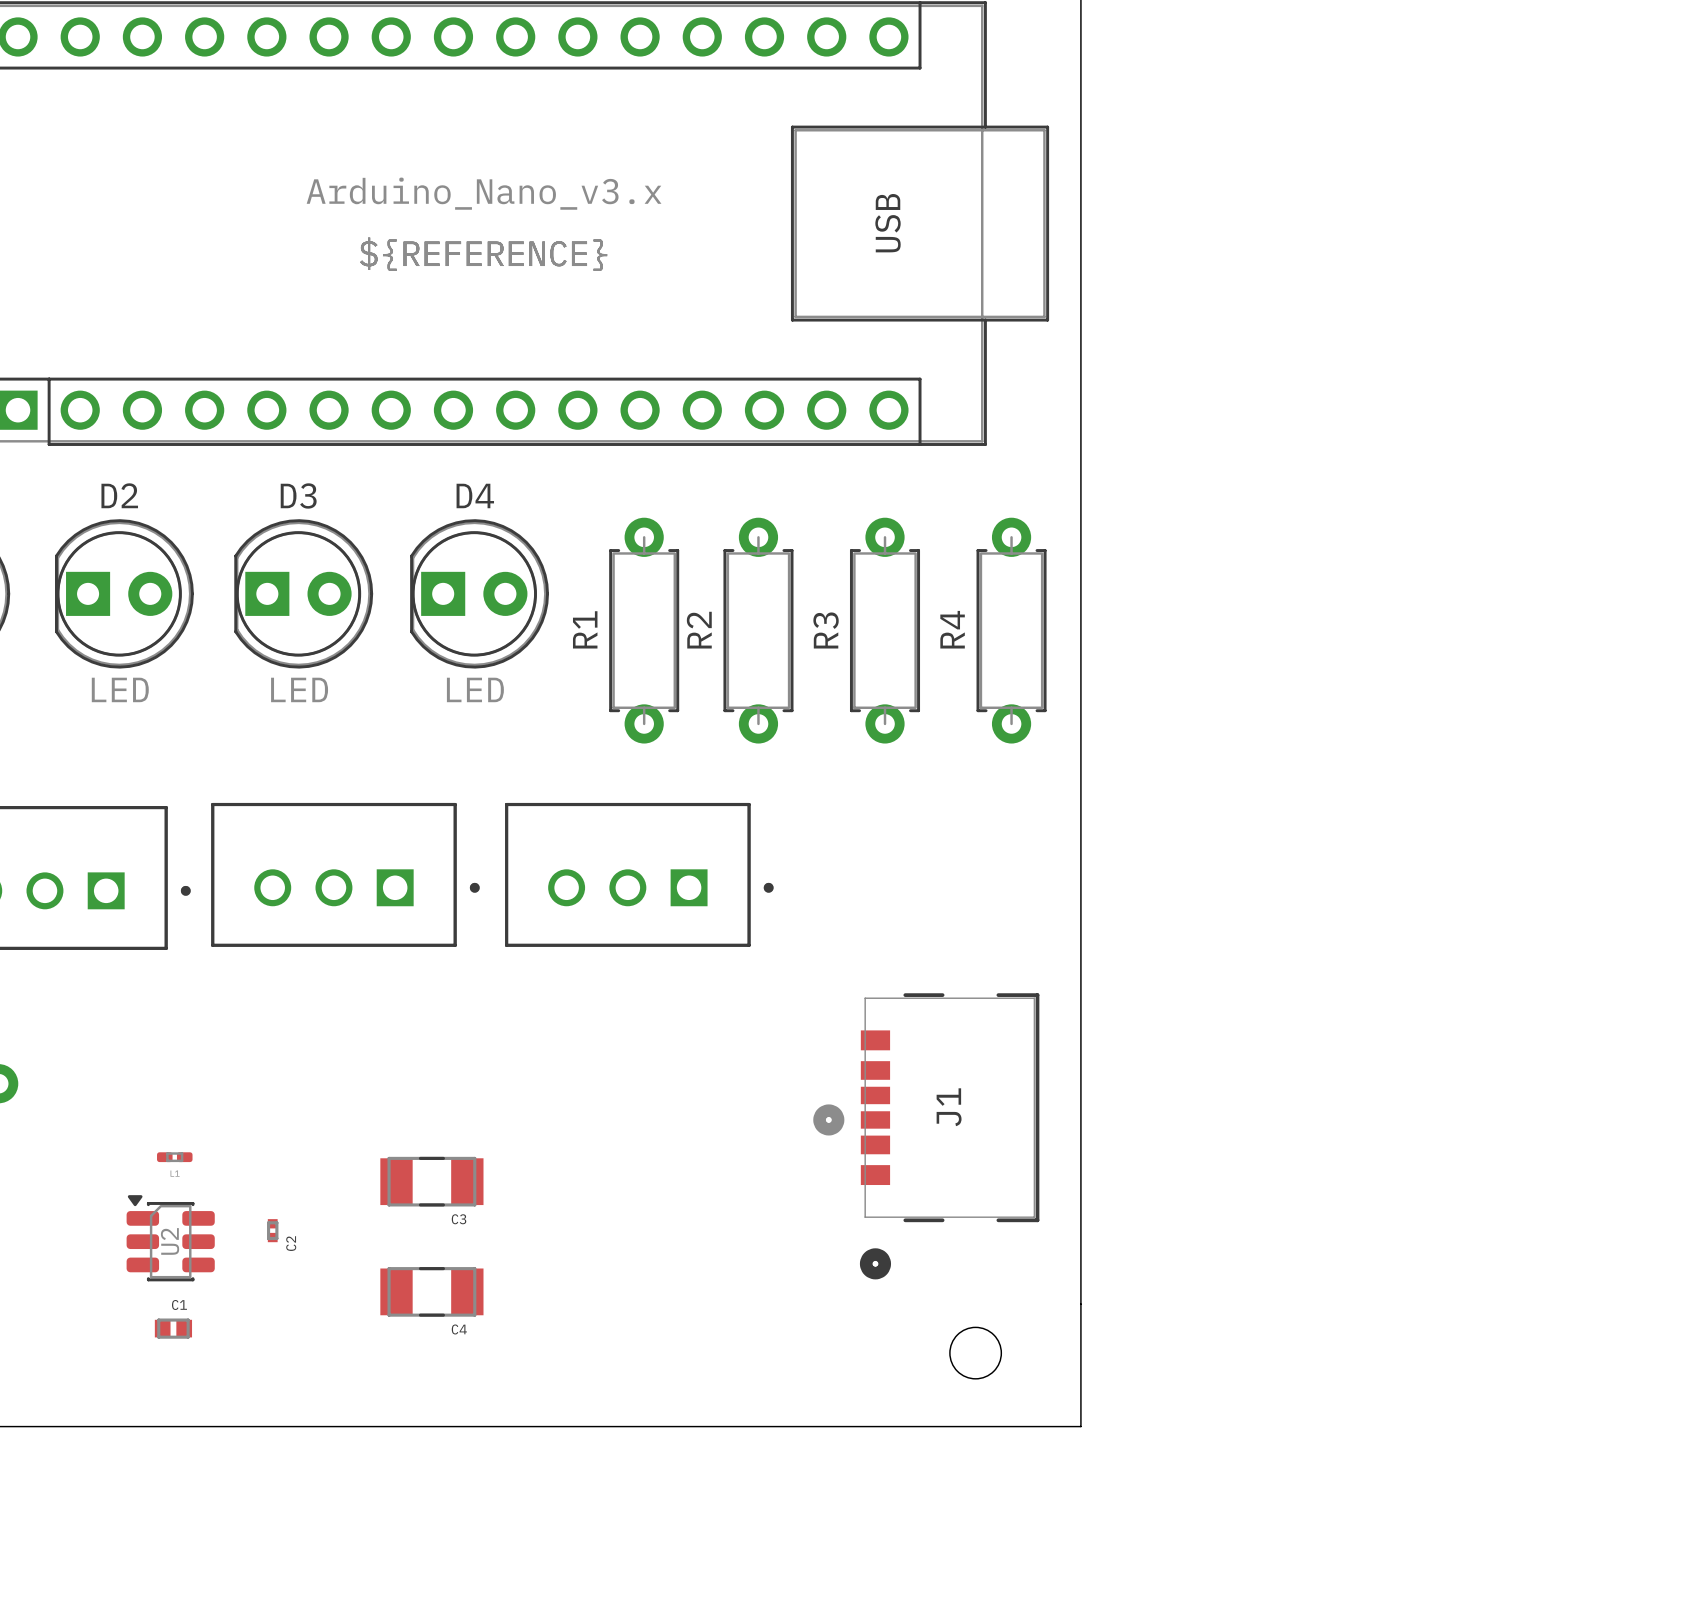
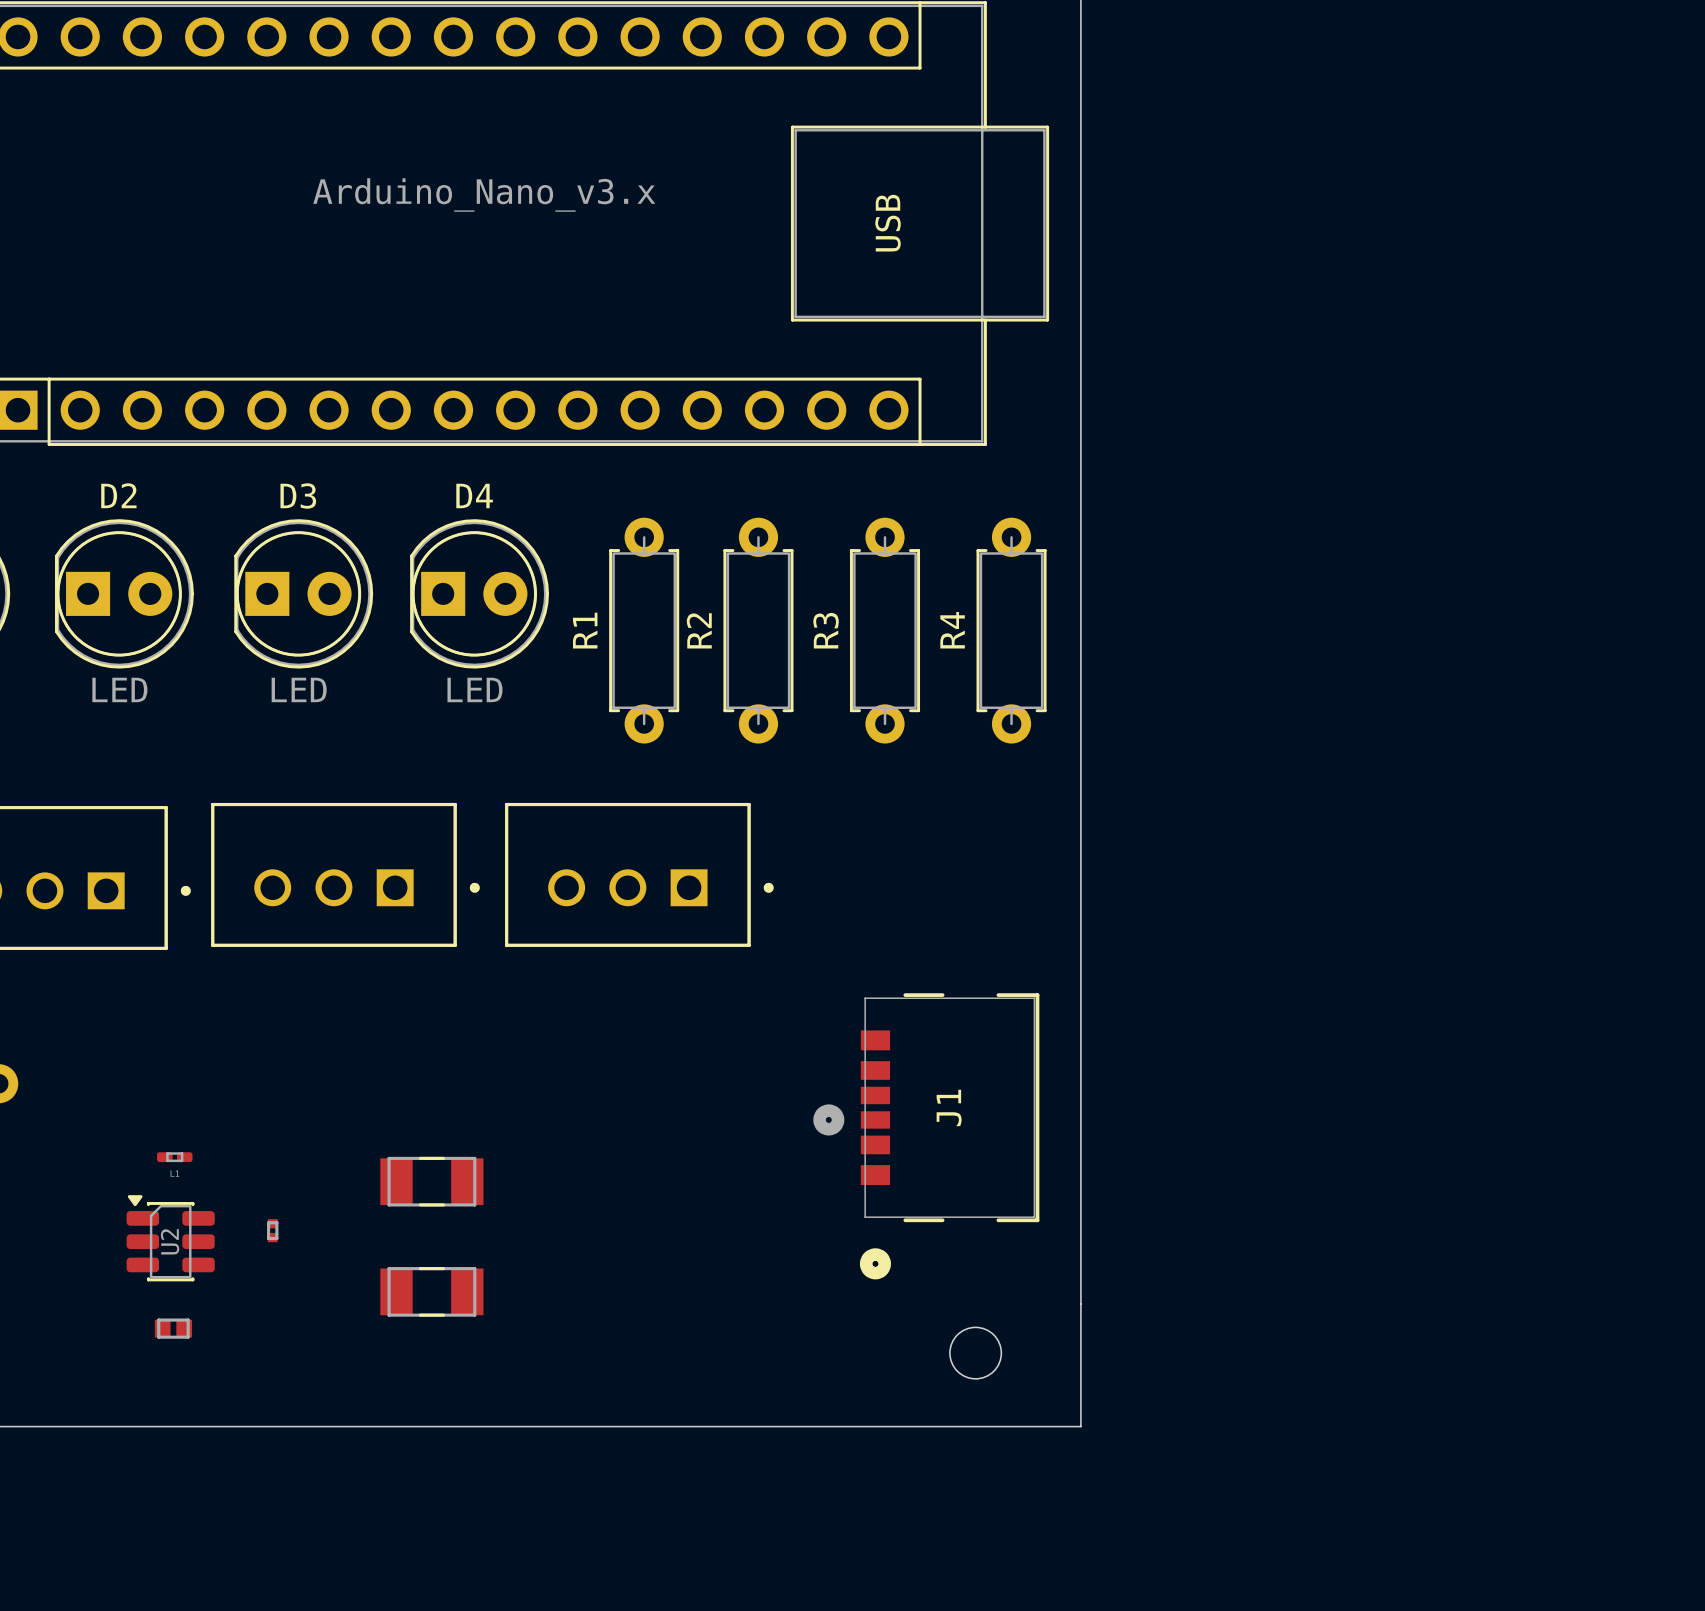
text: ${REFERENCE} (483, 254) -> none
C3 name: C3 (459, 1219) -> none
C2 name: C2 (291, 1243) -> none
C1 name: C1 (179, 1304) -> none
C4 name: C4 (459, 1329) -> none

